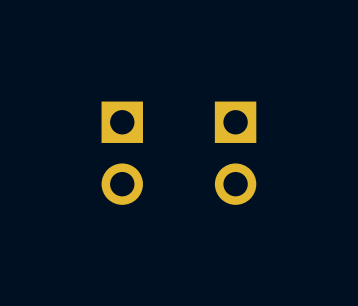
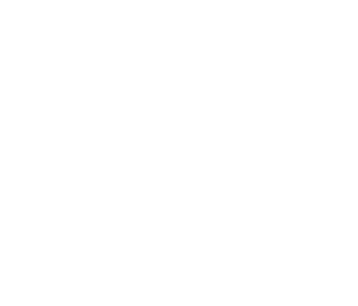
part: (122, 153) -> none
part: (235, 153) -> none

